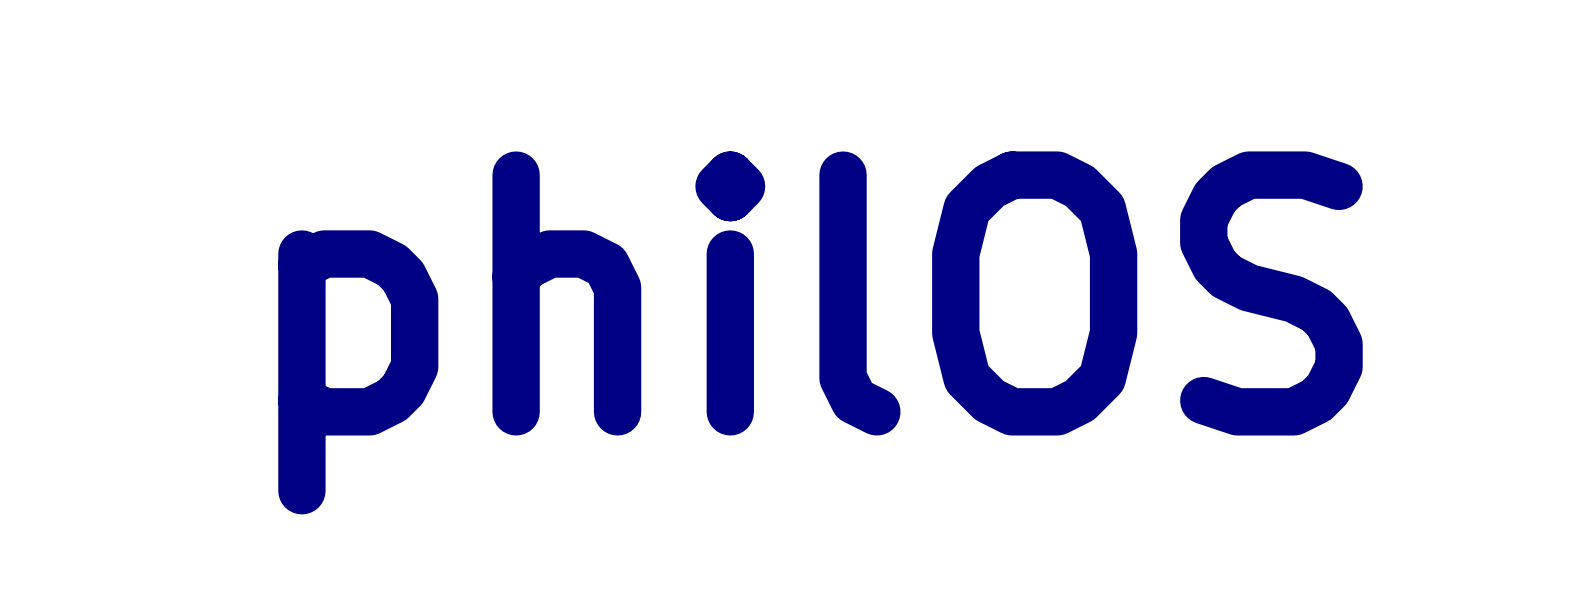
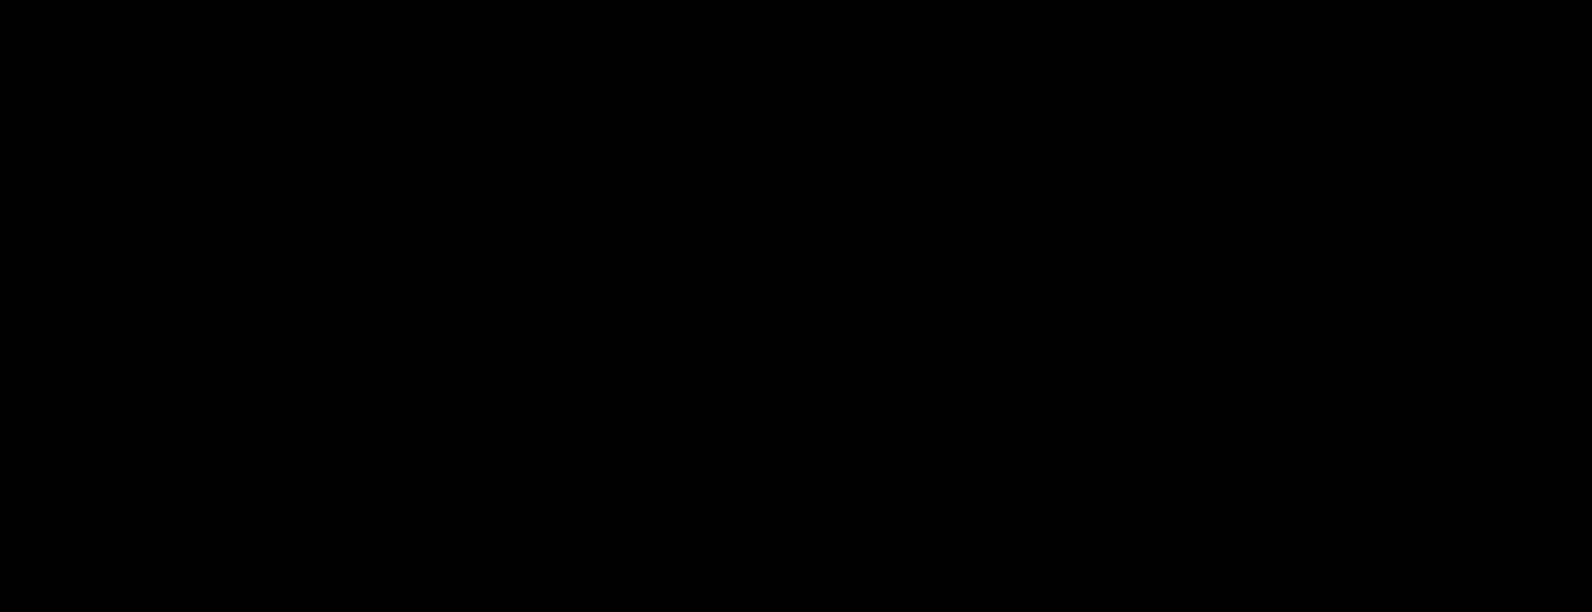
text: philOS (820, 332) -> none

